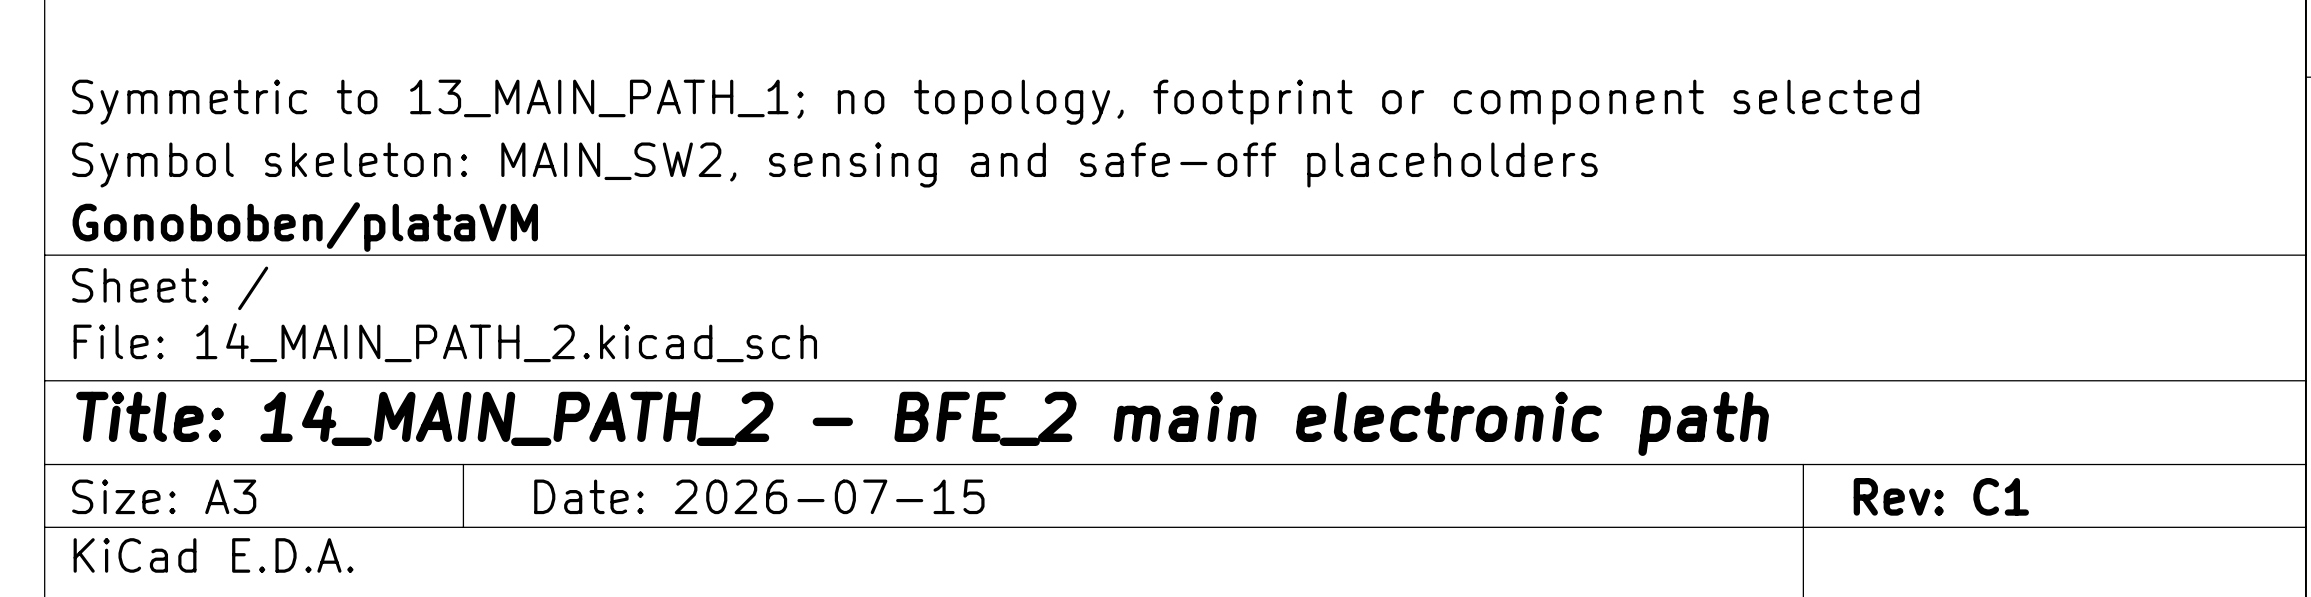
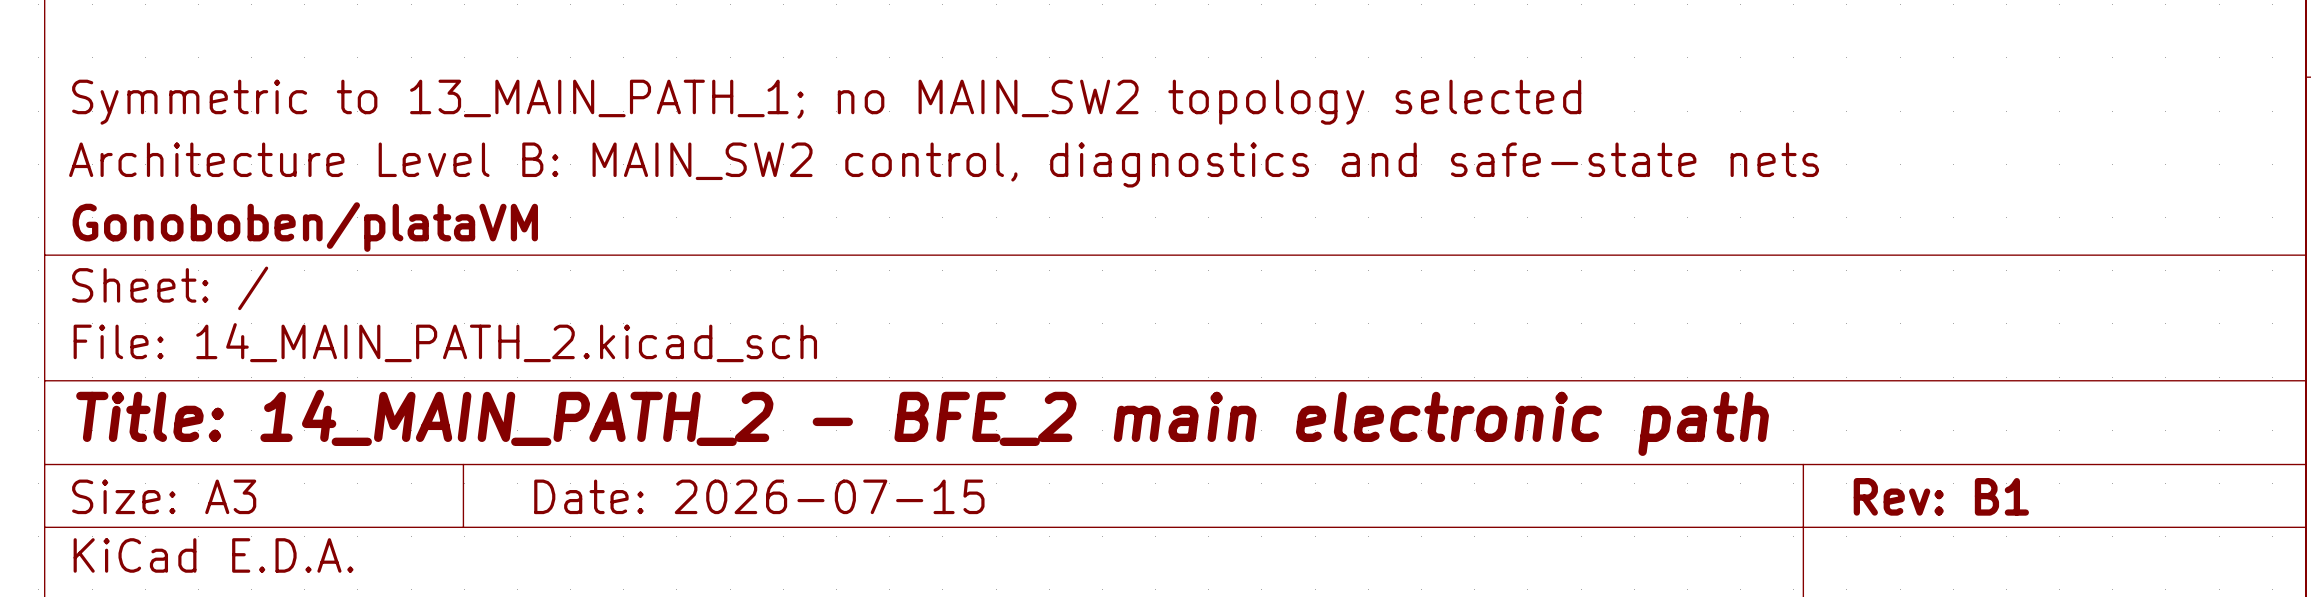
title block: Symmetric to 13_MAIN_PATH_1; no topology, footprint or component selected (995, 102) -> Symmetric to 13_MAIN_PATH_1; no MAIN_SW2 topology selected (826, 102)
title block: Symbol skeleton: MAIN_SW2, sensing and safe-off placeholders (834, 164) -> Architecture Level B: MAIN_SW2 control, diagnostics and safe-state nets (944, 164)
title block: Rev: C1 (1941, 496) -> Rev: B1 (1941, 496)

